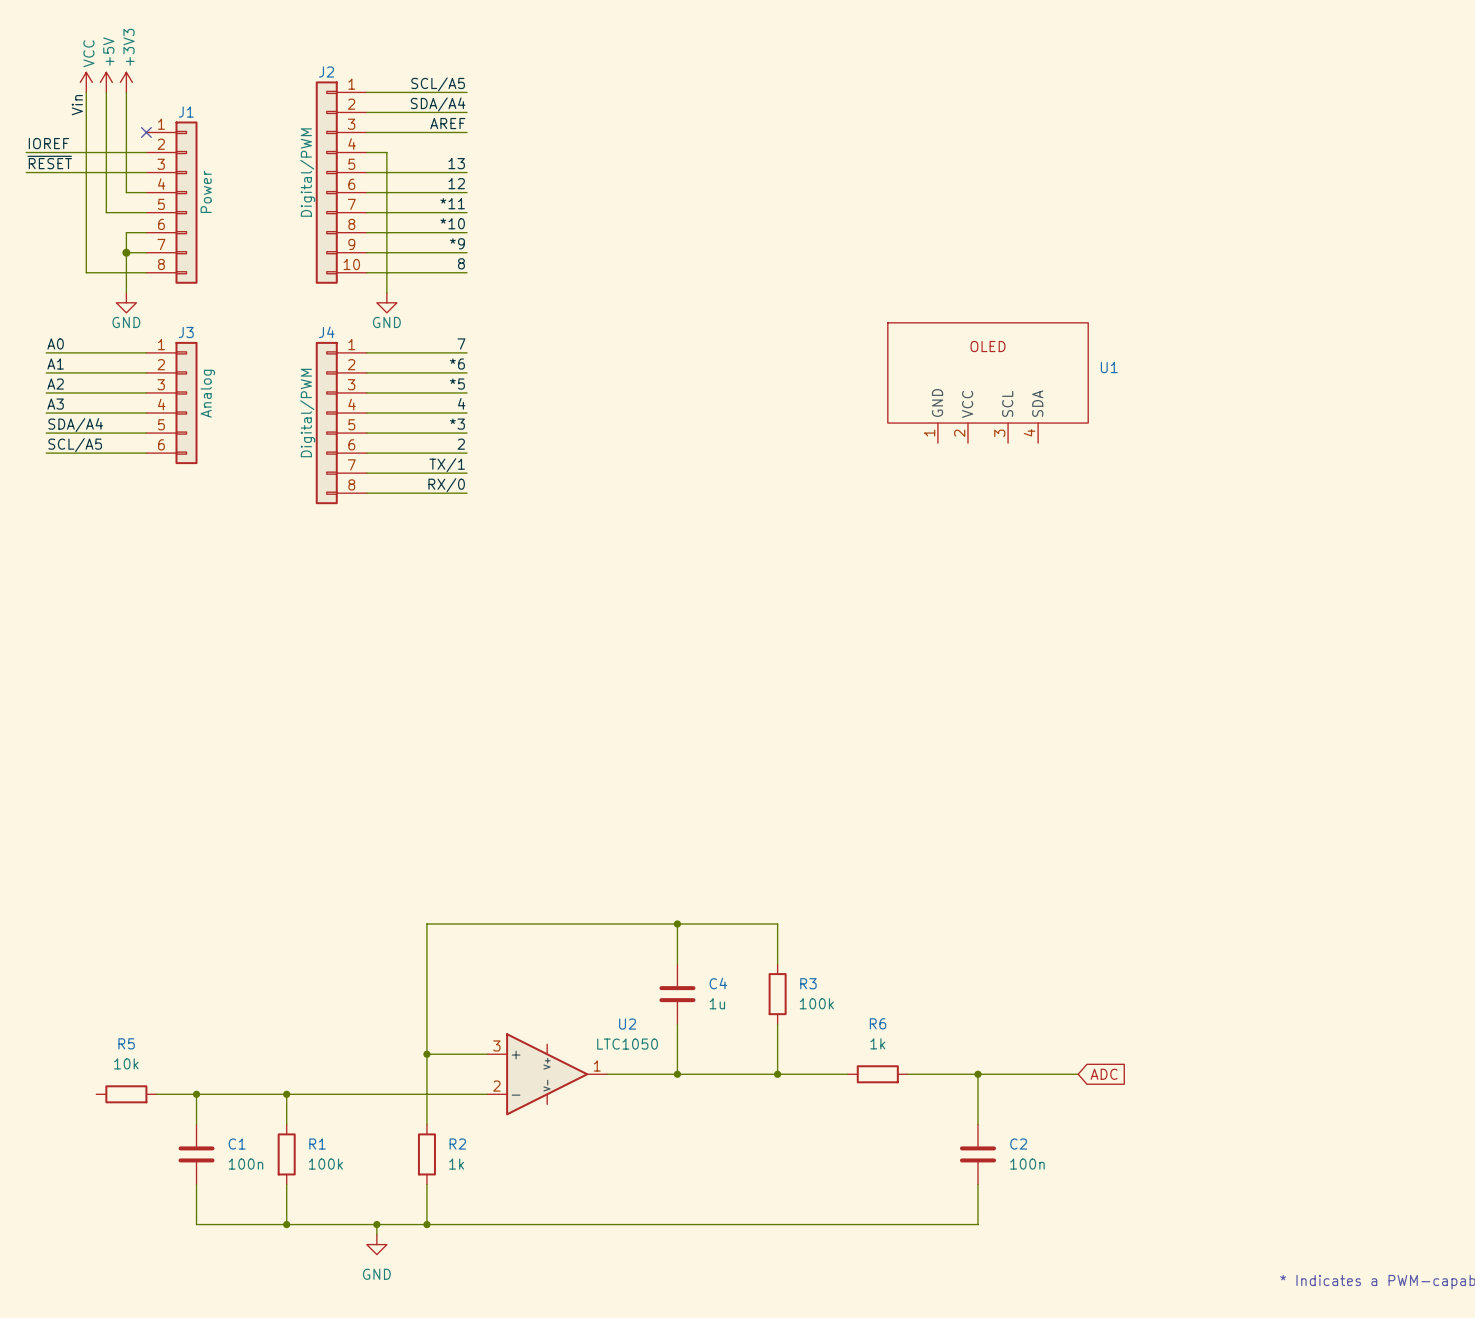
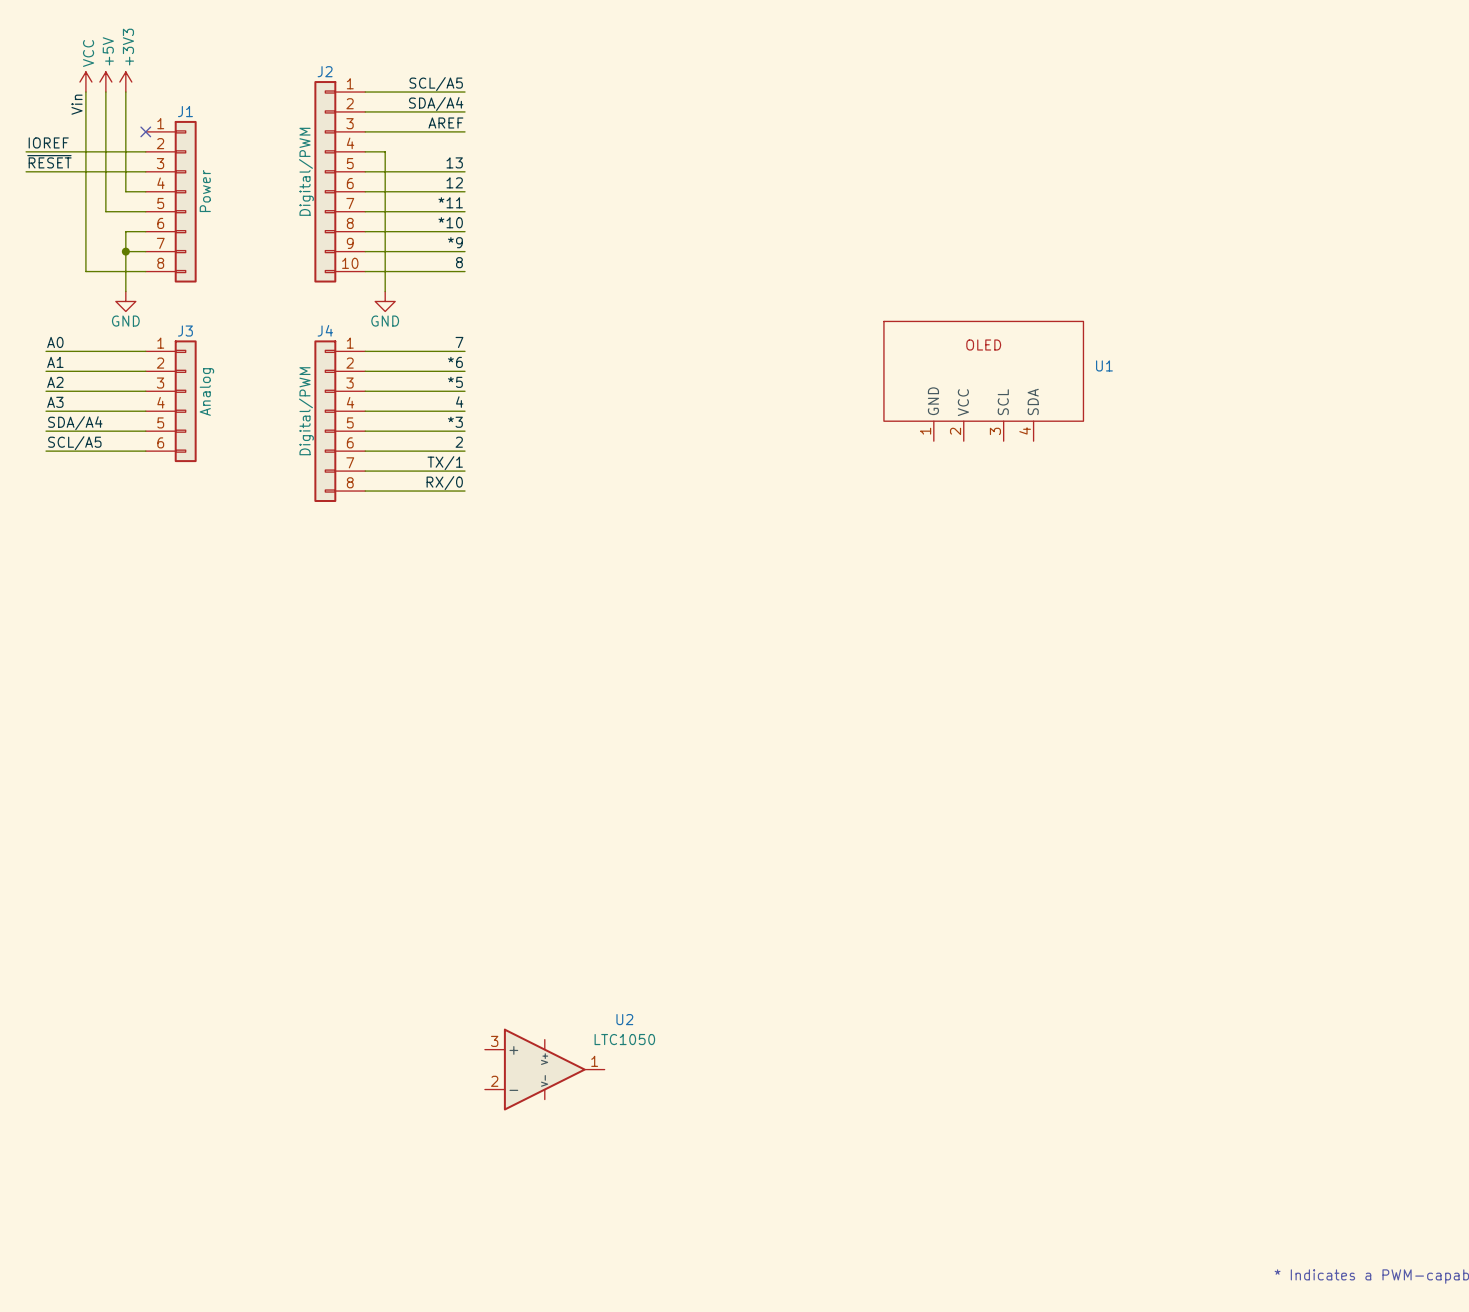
wire: (677, 923) (677, 964) -> none
junction: (677, 923) -> none
wire: (777, 964) (777, 923) (426, 923) (426, 1124) -> none
C4: 1u (677, 994) -> none
R3: 100k (777, 994) -> none
wire: (677, 1024) (677, 1074) -> none
wire: (777, 1024) (777, 1074) -> none
wire: (426, 1054) (487, 1054) -> none
junction: (426, 1054) -> none
wire: (607, 1074) (847, 1074) -> none
junction: (677, 1074) -> none
junction: (777, 1074) -> none
R6: 1k (877, 1074) -> none
wire: (907, 1074) (1078, 1074) -> none
wire: (978, 1074) (978, 1124) -> none
junction: (978, 1074) -> none
global label: ADC (1104, 1074) -> none
R5: 10k (126, 1094) -> none
wire: (156, 1094) (487, 1094) -> none
wire: (196, 1094) (196, 1124) -> none
junction: (196, 1094) -> none
wire: (286, 1094) (286, 1124) -> none
junction: (286, 1094) -> none
C1: 100n (196, 1154) -> none
R1: 100k (286, 1154) -> none
R2: 1k (426, 1154) -> none
C2: 100n (978, 1154) -> none
wire: (196, 1184) (196, 1224) (978, 1224) (978, 1184) -> none
wire: (286, 1184) (286, 1224) -> none
wire: (426, 1184) (426, 1224) -> none
junction: (286, 1224) -> none
wire: (376, 1224) (376, 1234) -> none
junction: (376, 1224) -> none
junction: (426, 1224) -> none
power symbol: GND (376, 1244) -> none

